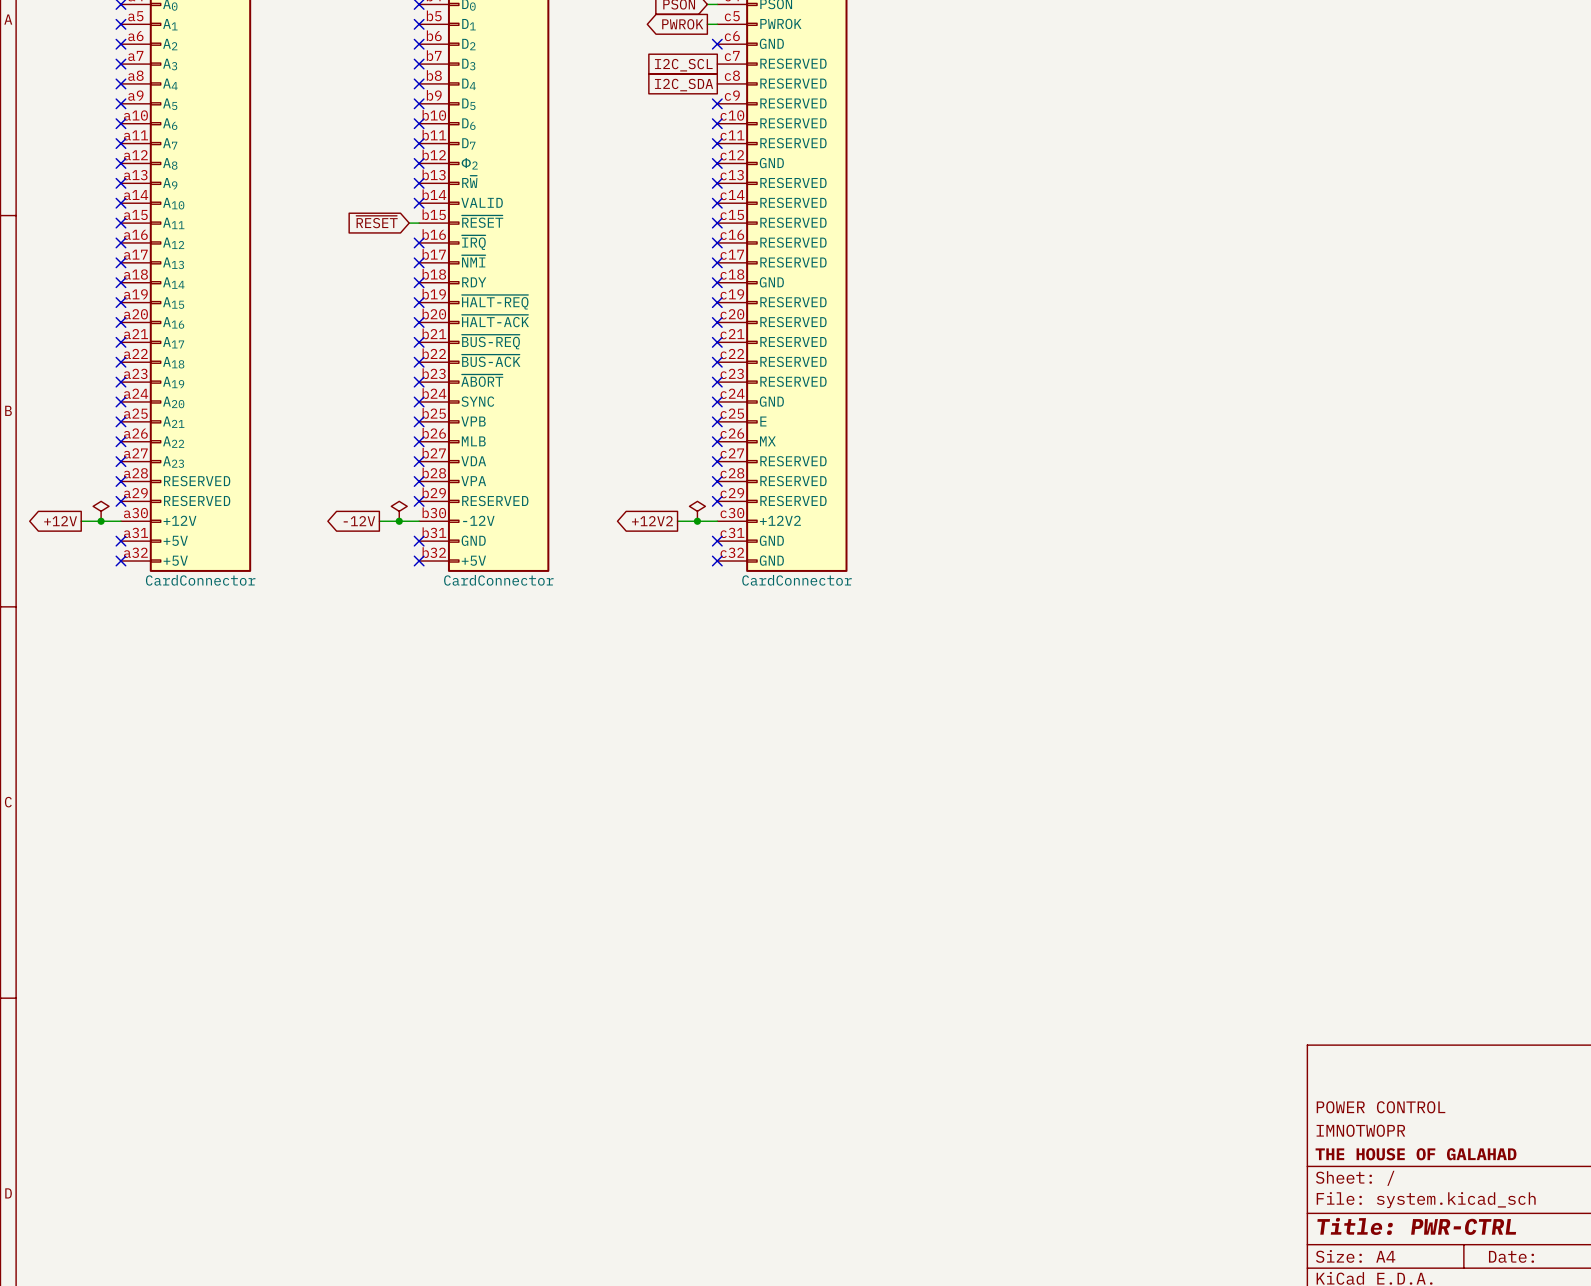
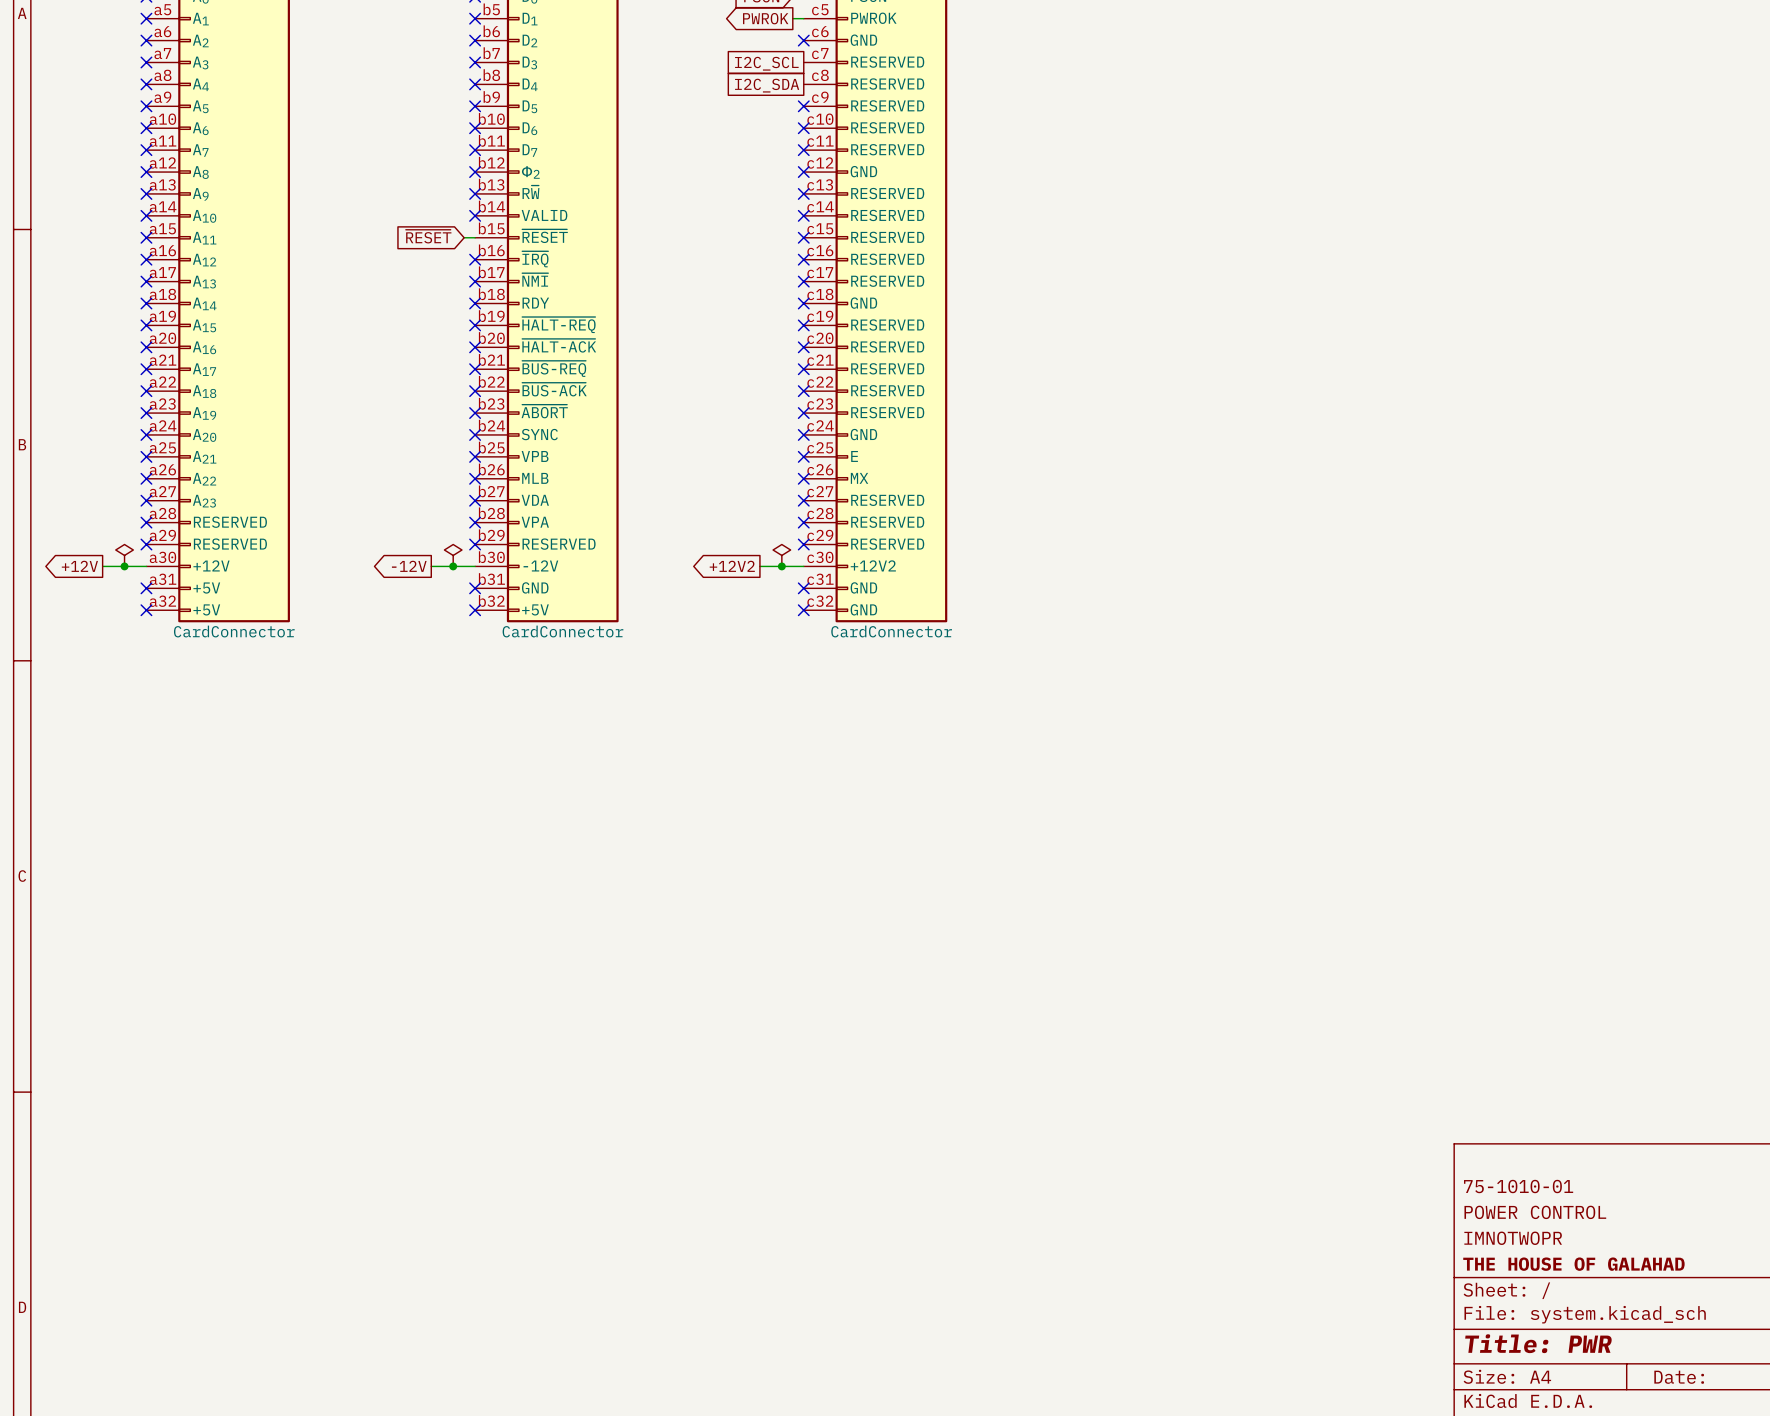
title block: none -> 75-1010-01 (1518, 1186)
title block: Title: PWR-CTRL (1416, 1226) -> Title: PWR (1538, 1343)

